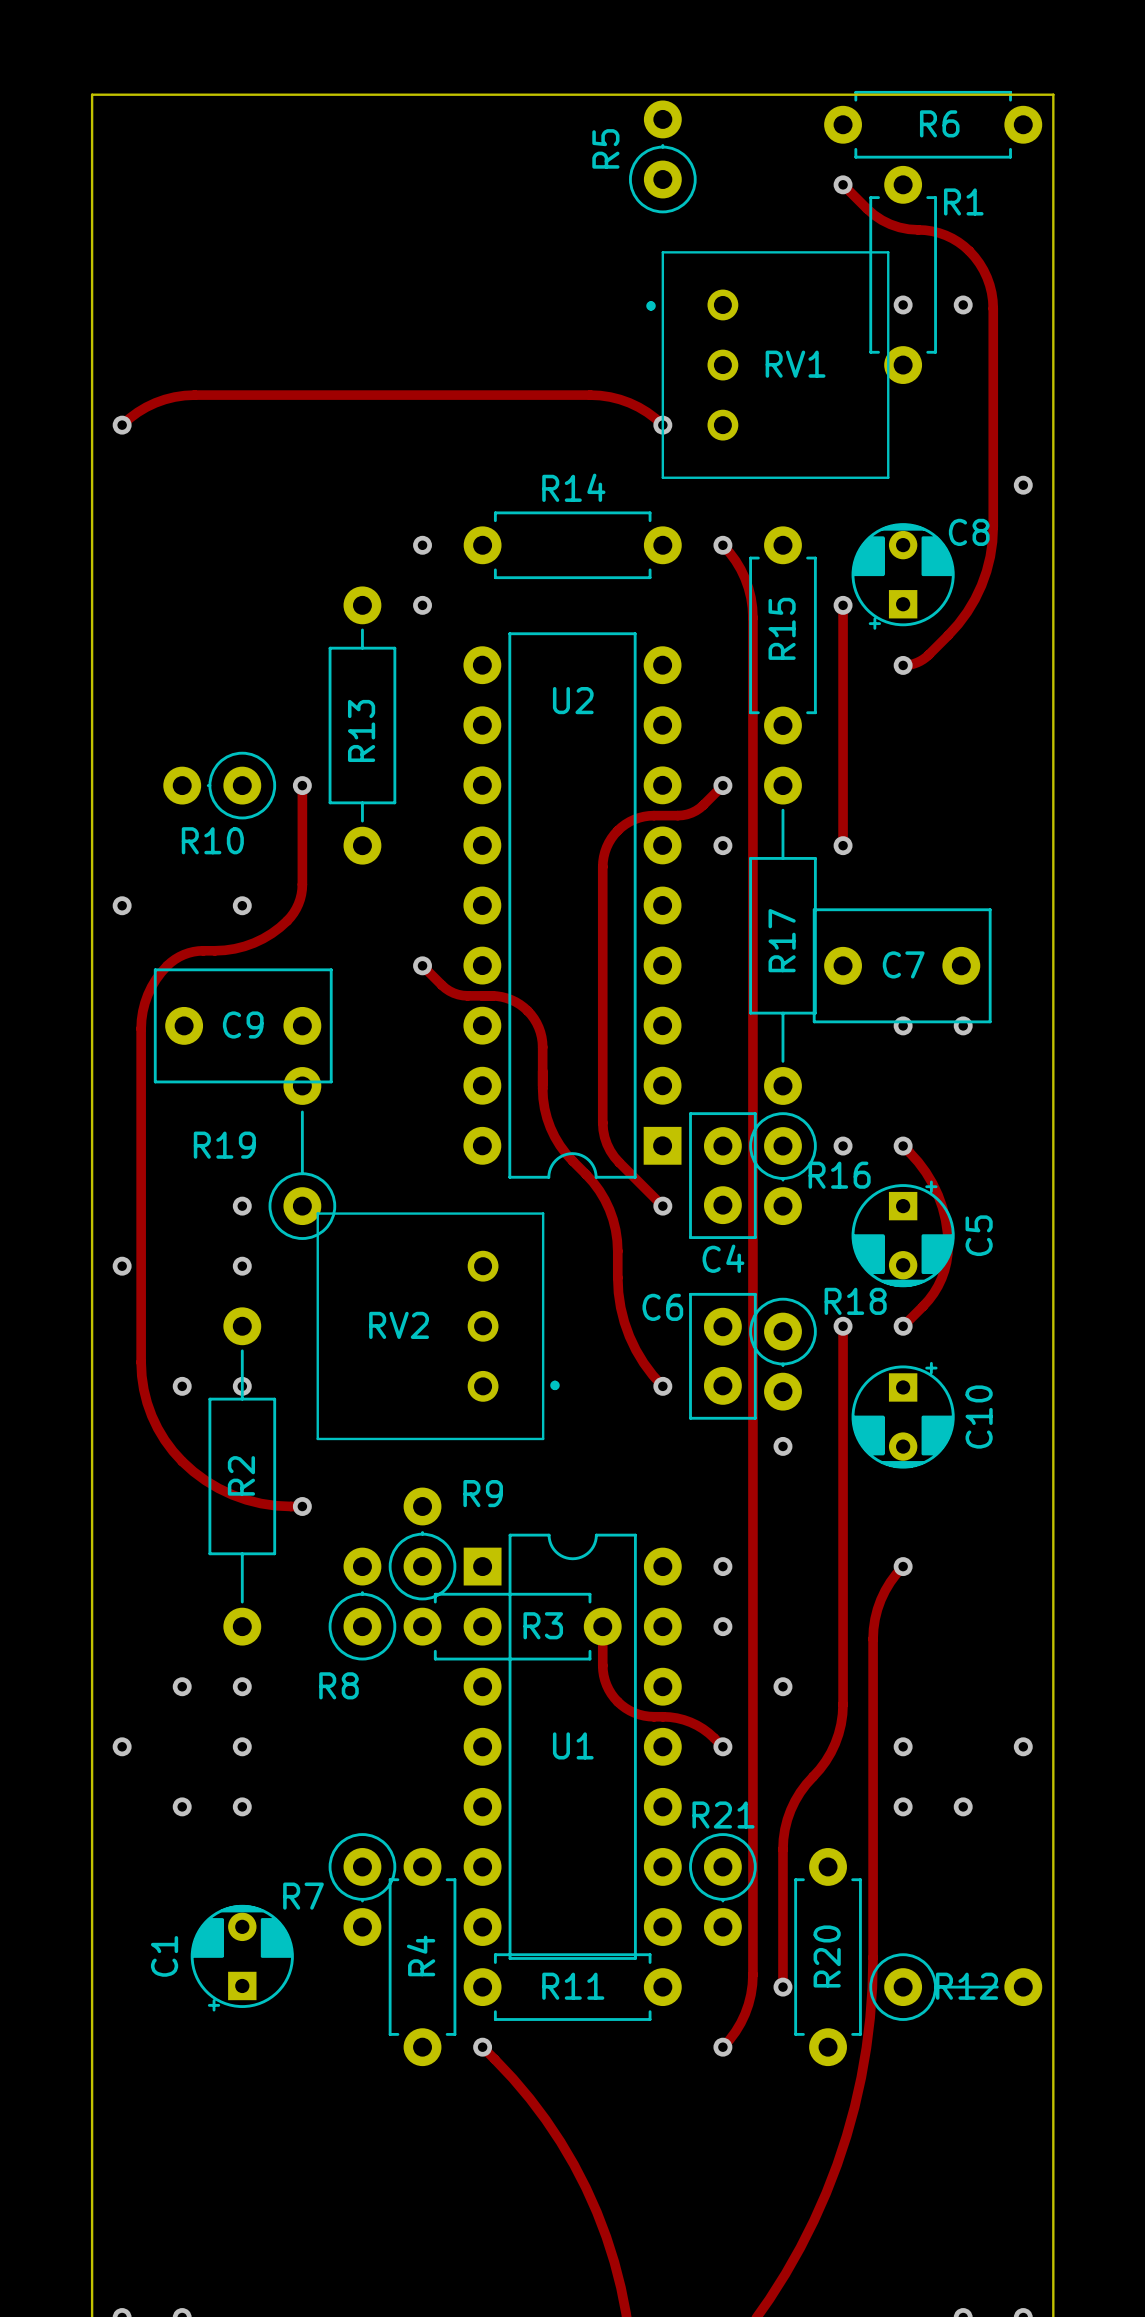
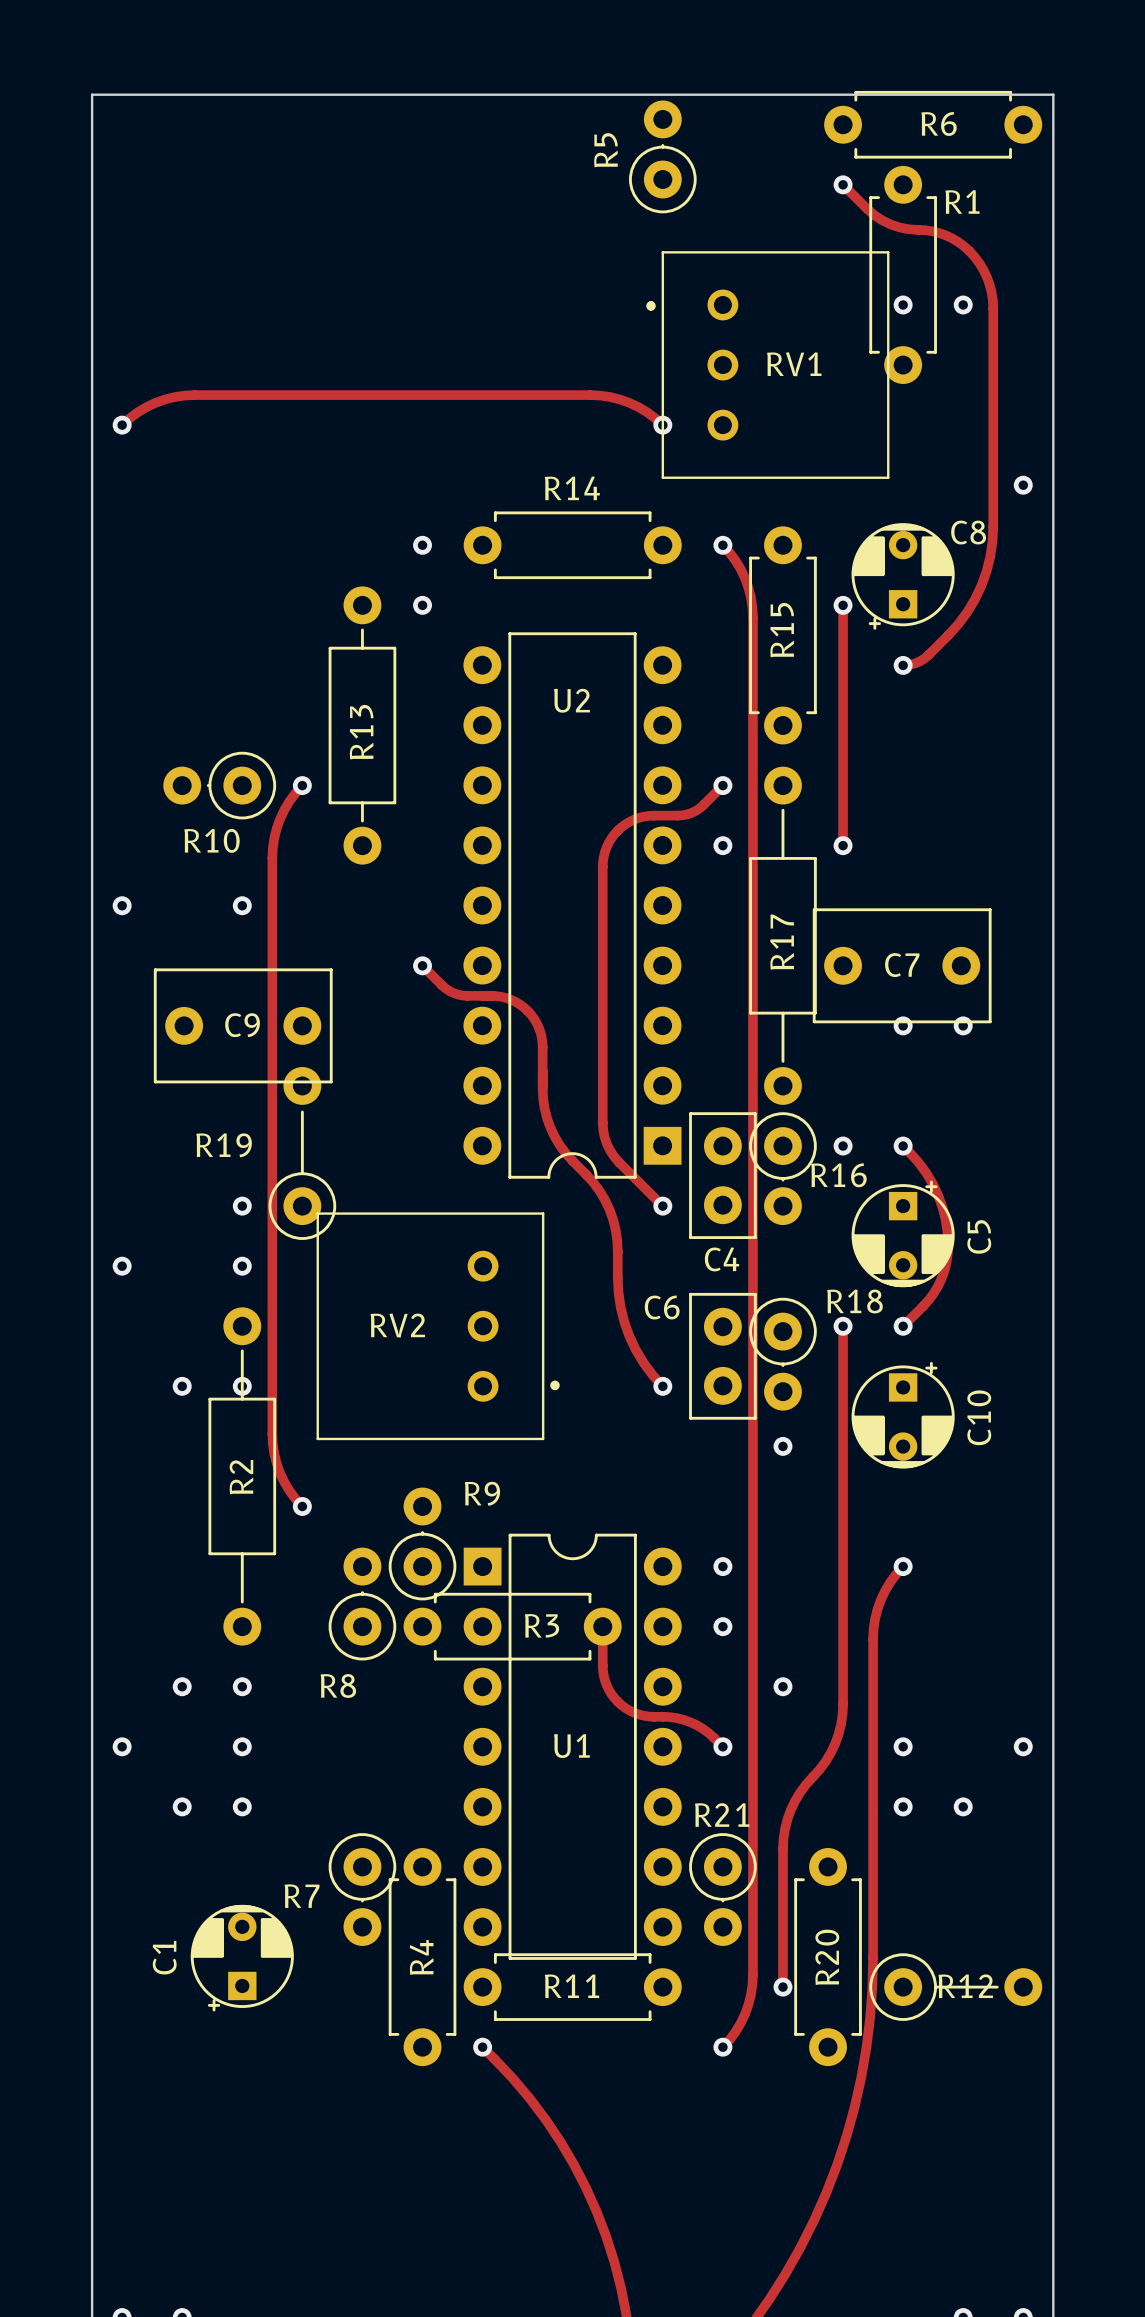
track: (302, 785) (302, 889) (293, 912) (279, 927) (254, 942) (224, 950) (193, 951) (170, 962) (156, 979) (147, 994) (142, 1011) (141, 1028) (141, 1362) (147, 1402) (157, 1428) (172, 1451) (205, 1480) (246, 1499) (275, 1505) (302, 1506) -> (302, 785) (289, 801) (280, 818) (274, 838) (272, 858) (272, 1433) (274, 1453) (280, 1473) (289, 1490) (302, 1506)

